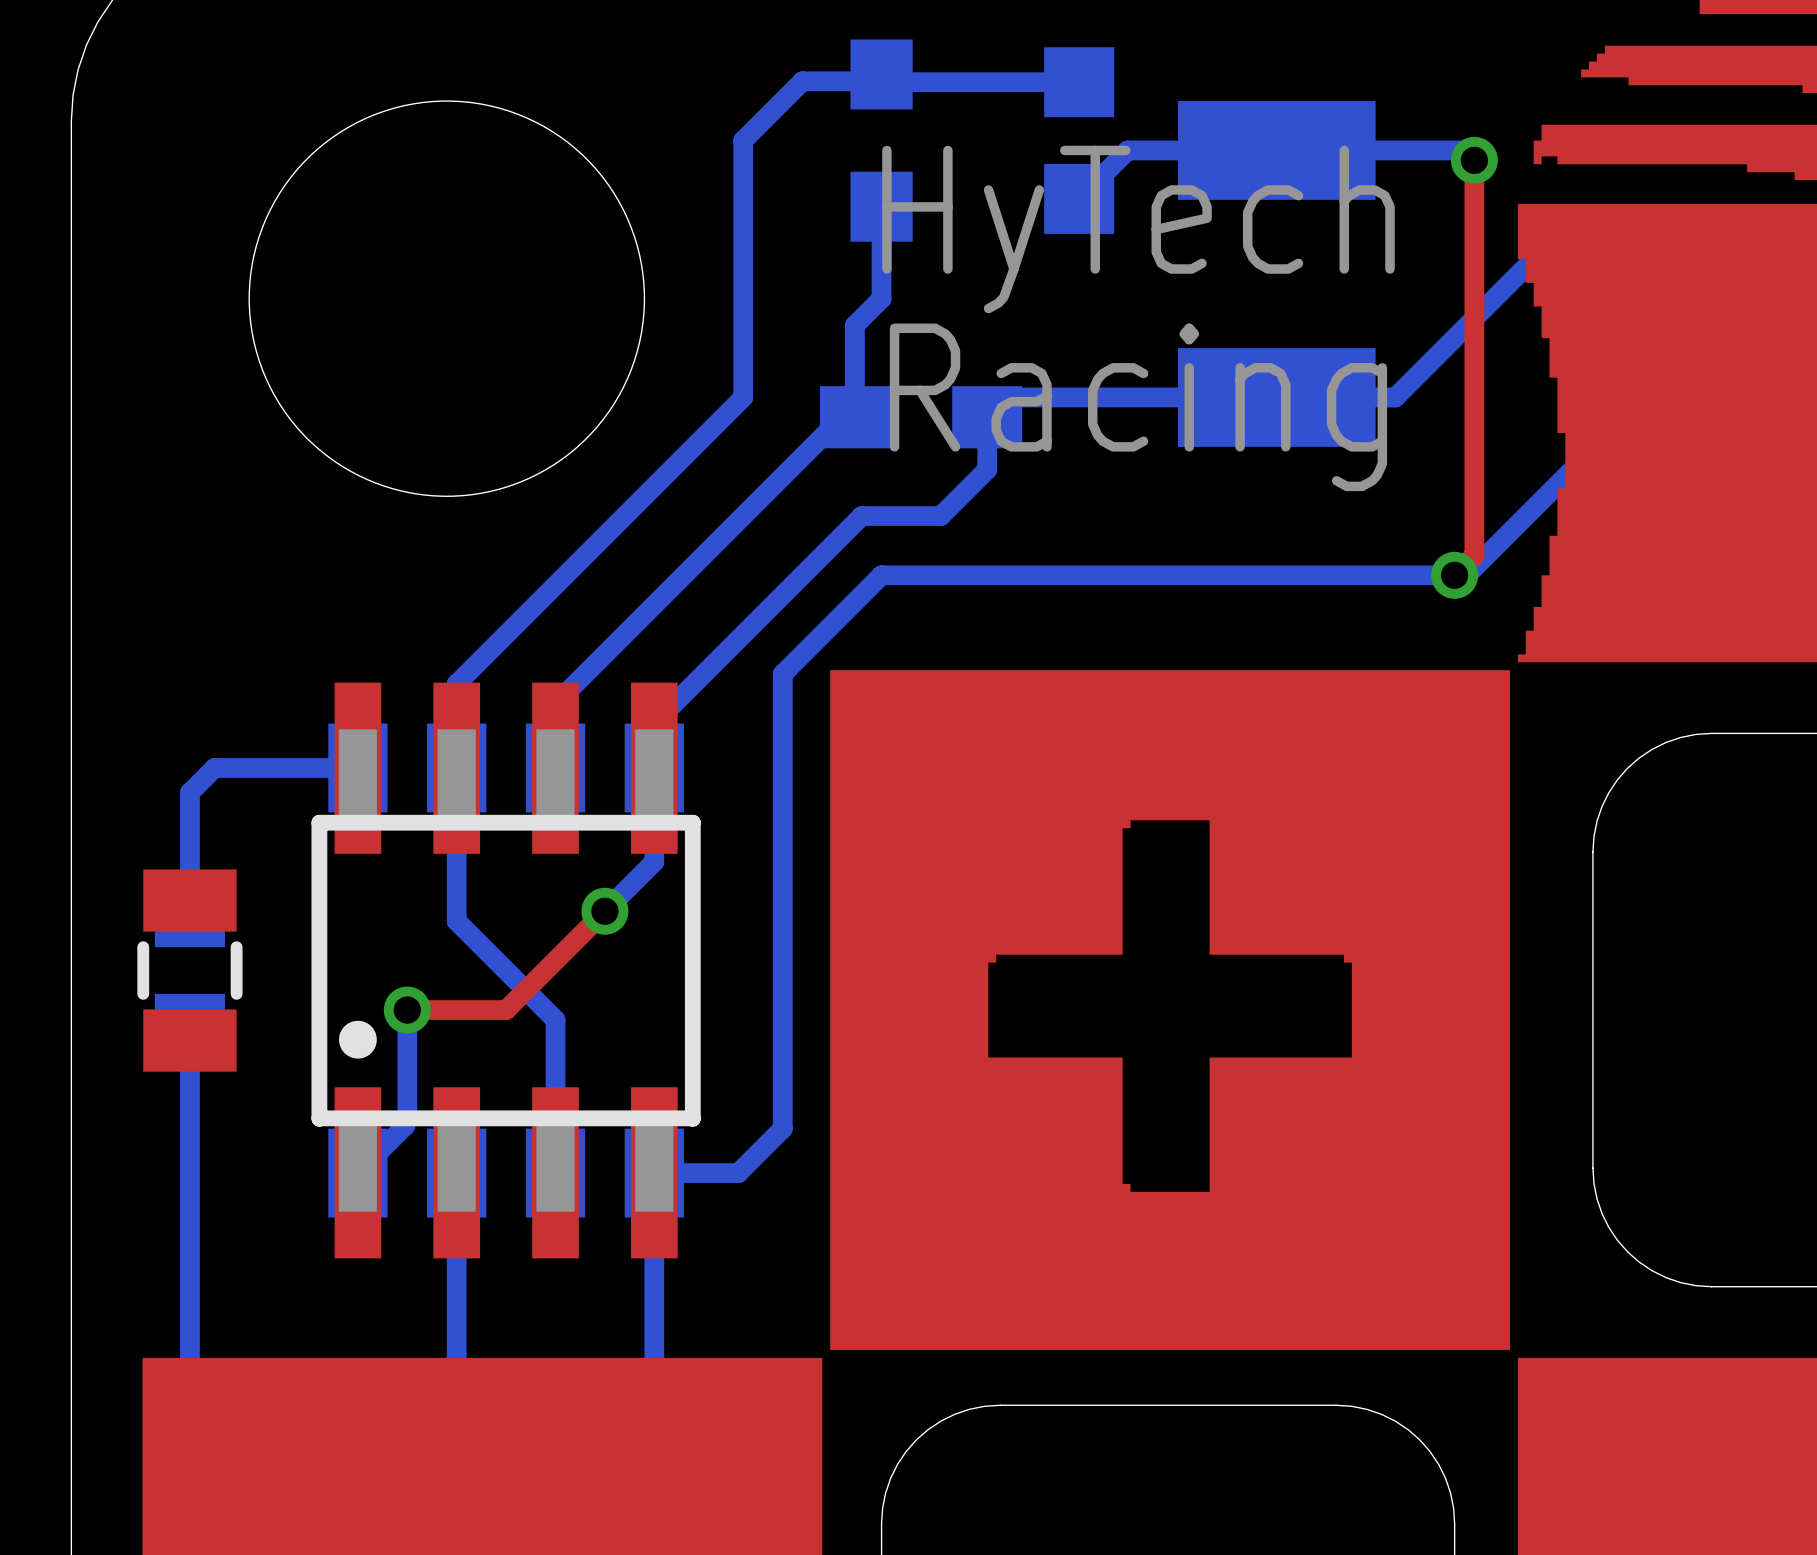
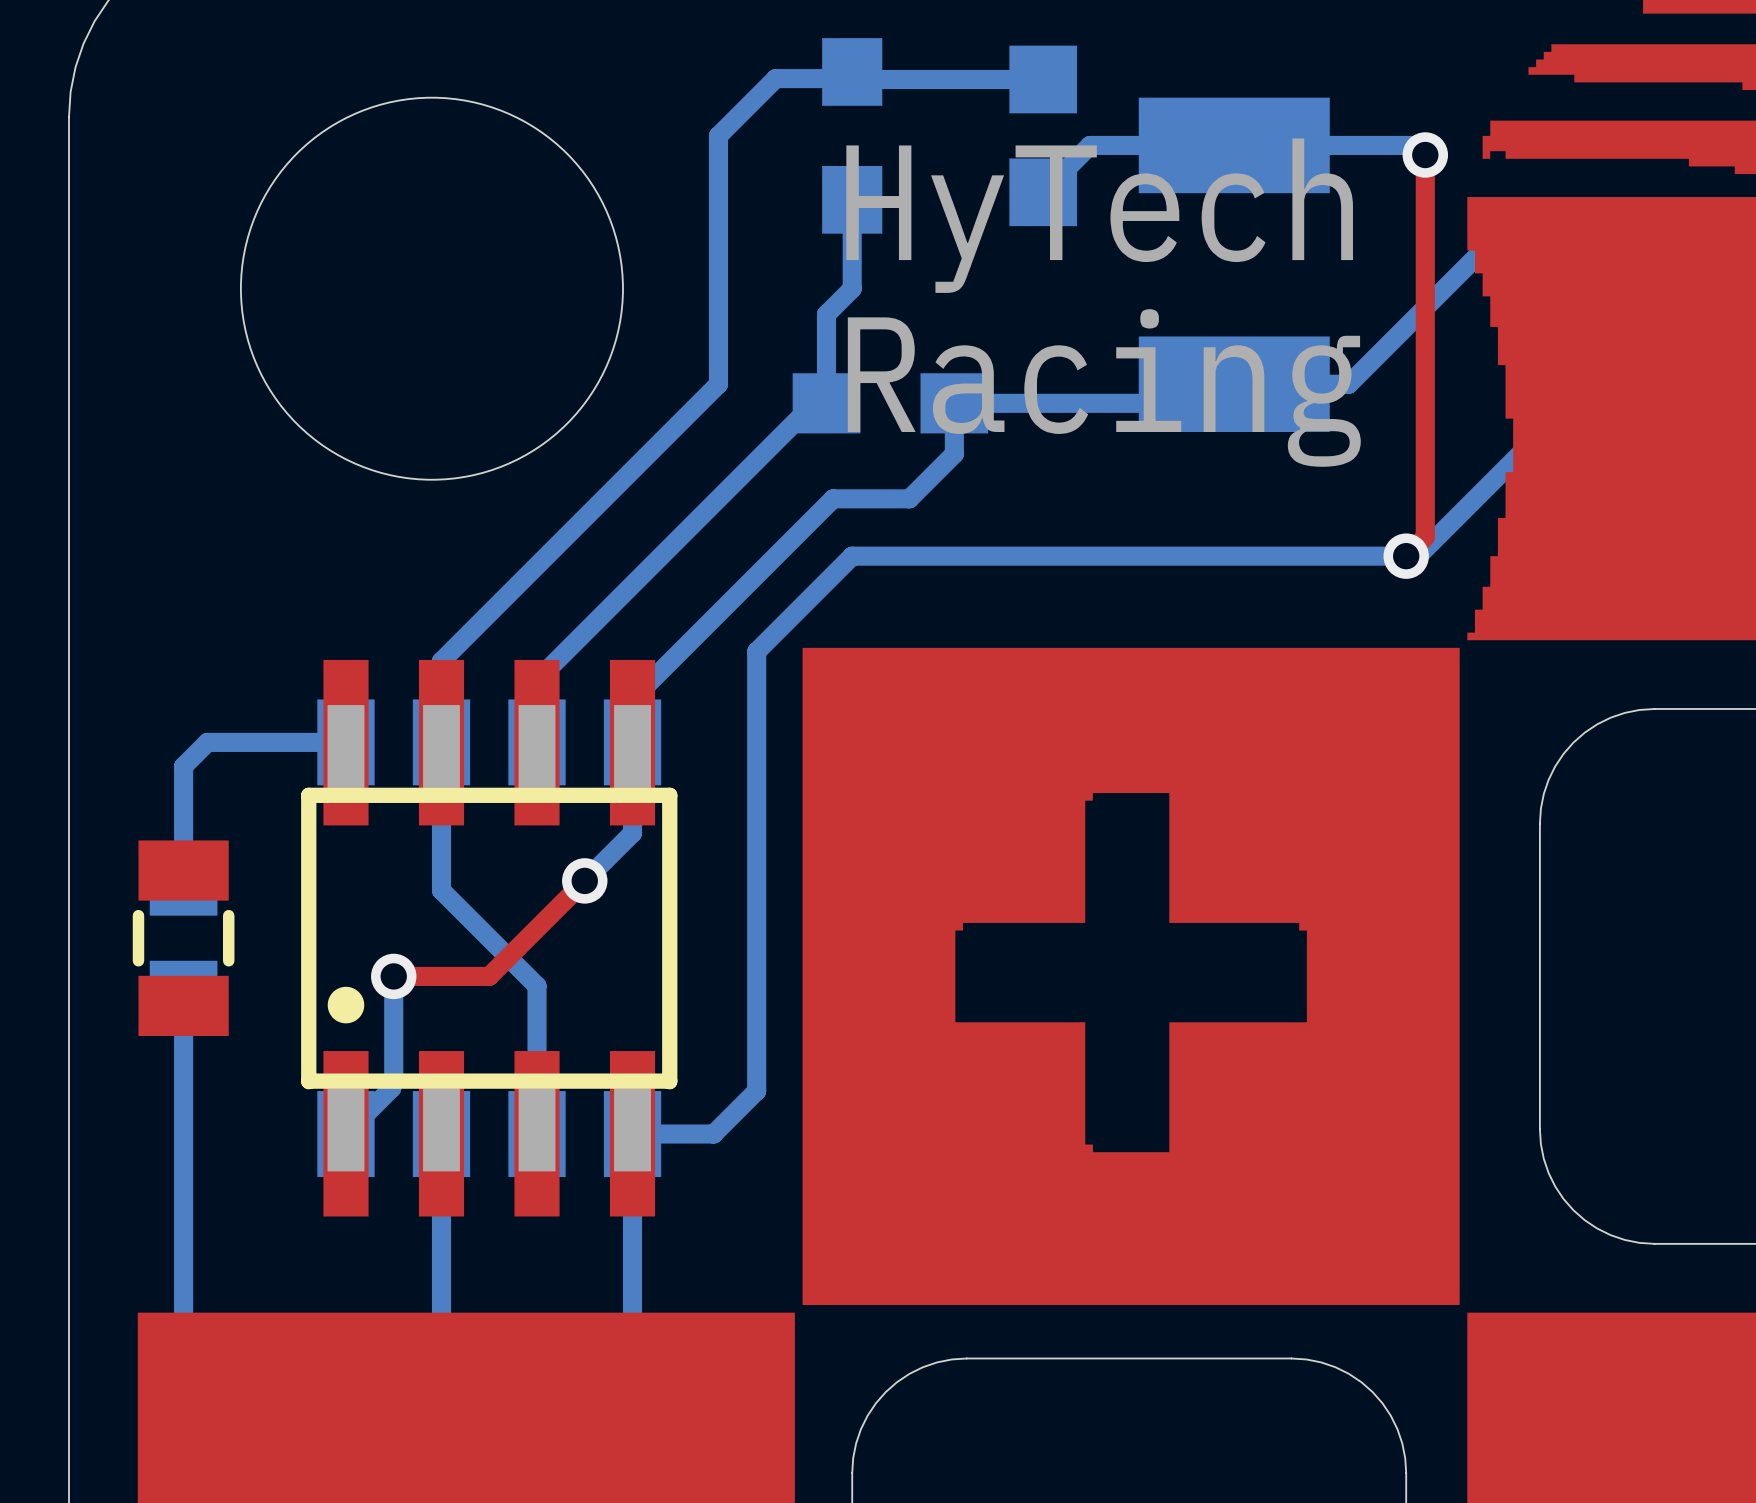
bottom track: (1276, 397) (1006, 397) (987, 417) -> (1234, 384) (1215, 403) (954, 403)

